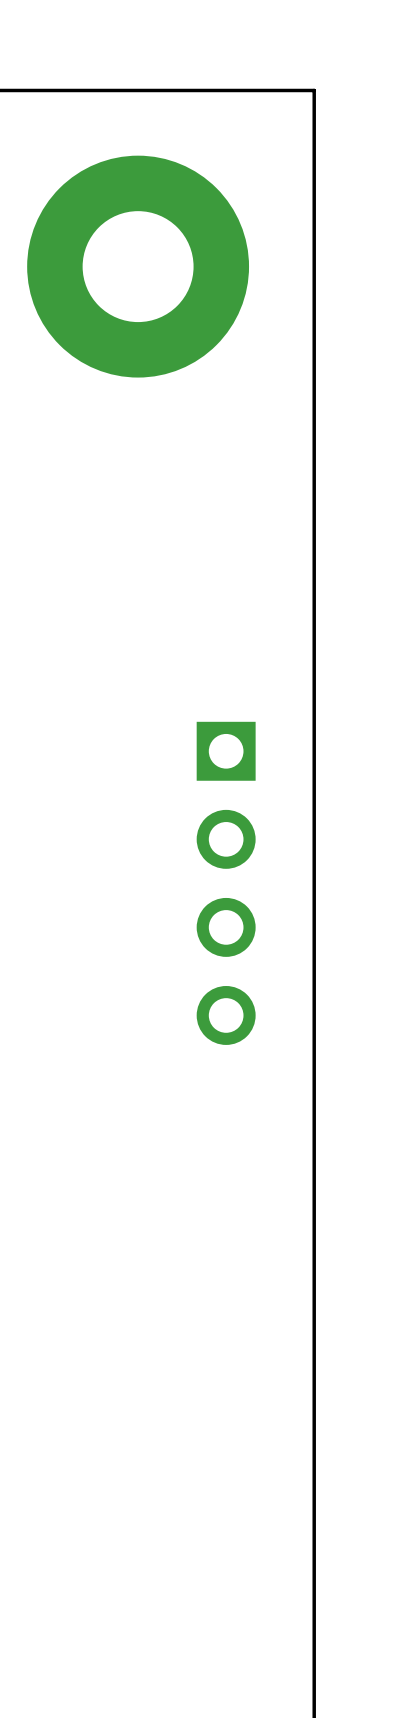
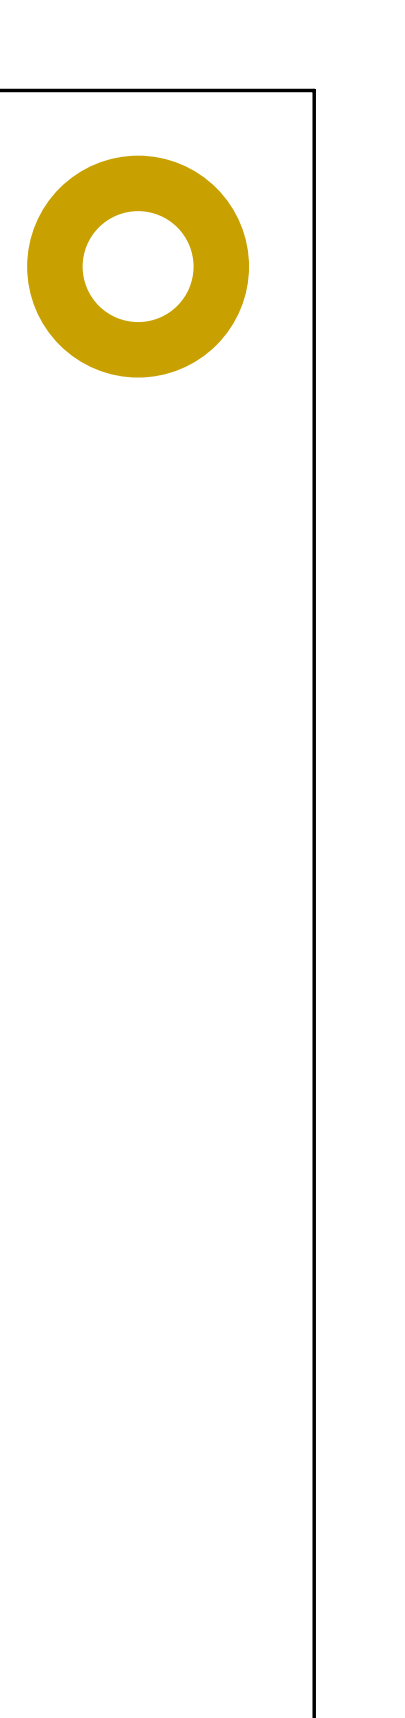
part: (226, 883) -> none

